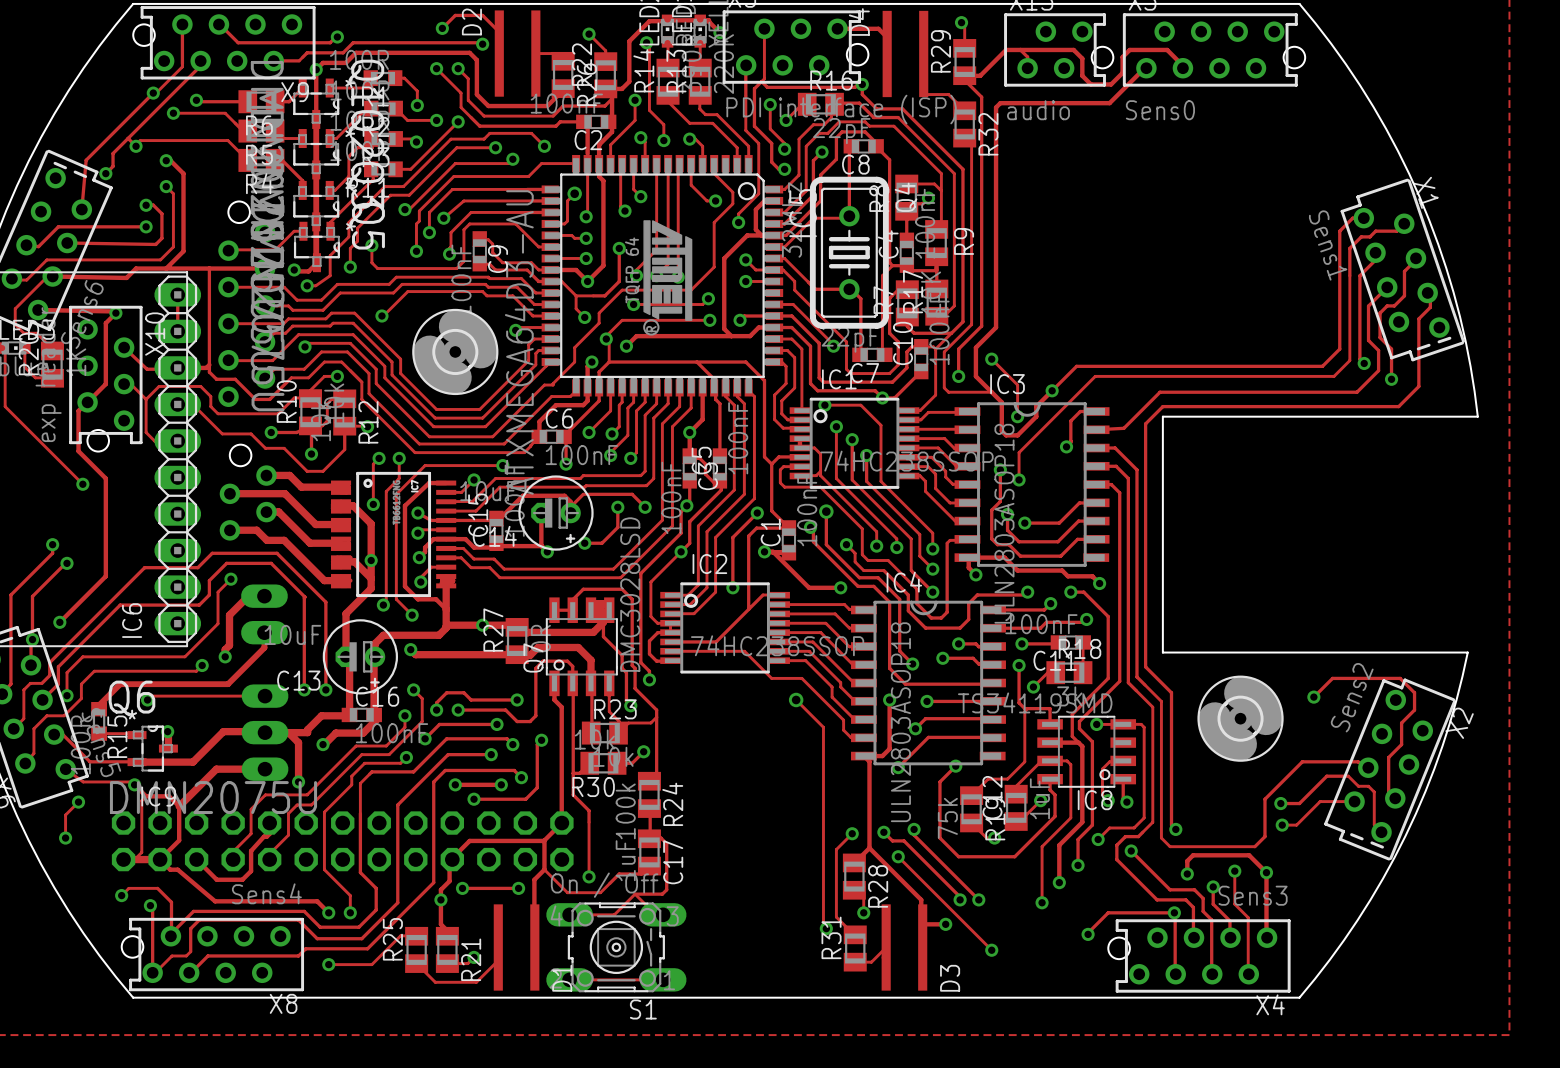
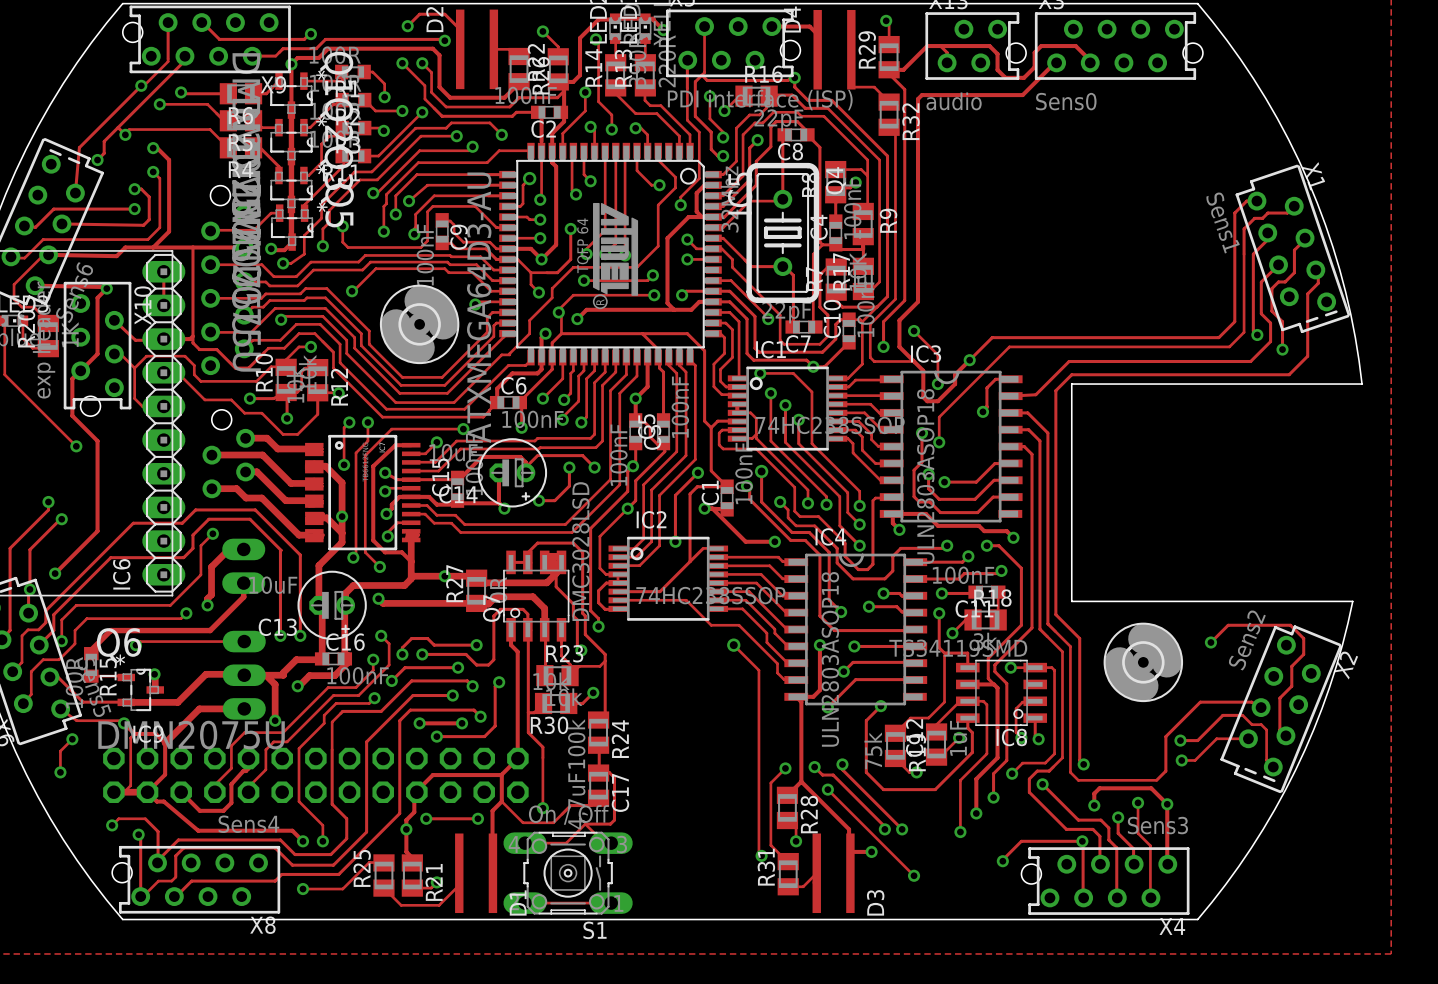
C17 value: 1uF (625, 860) -> 4,7uF (578, 801)

